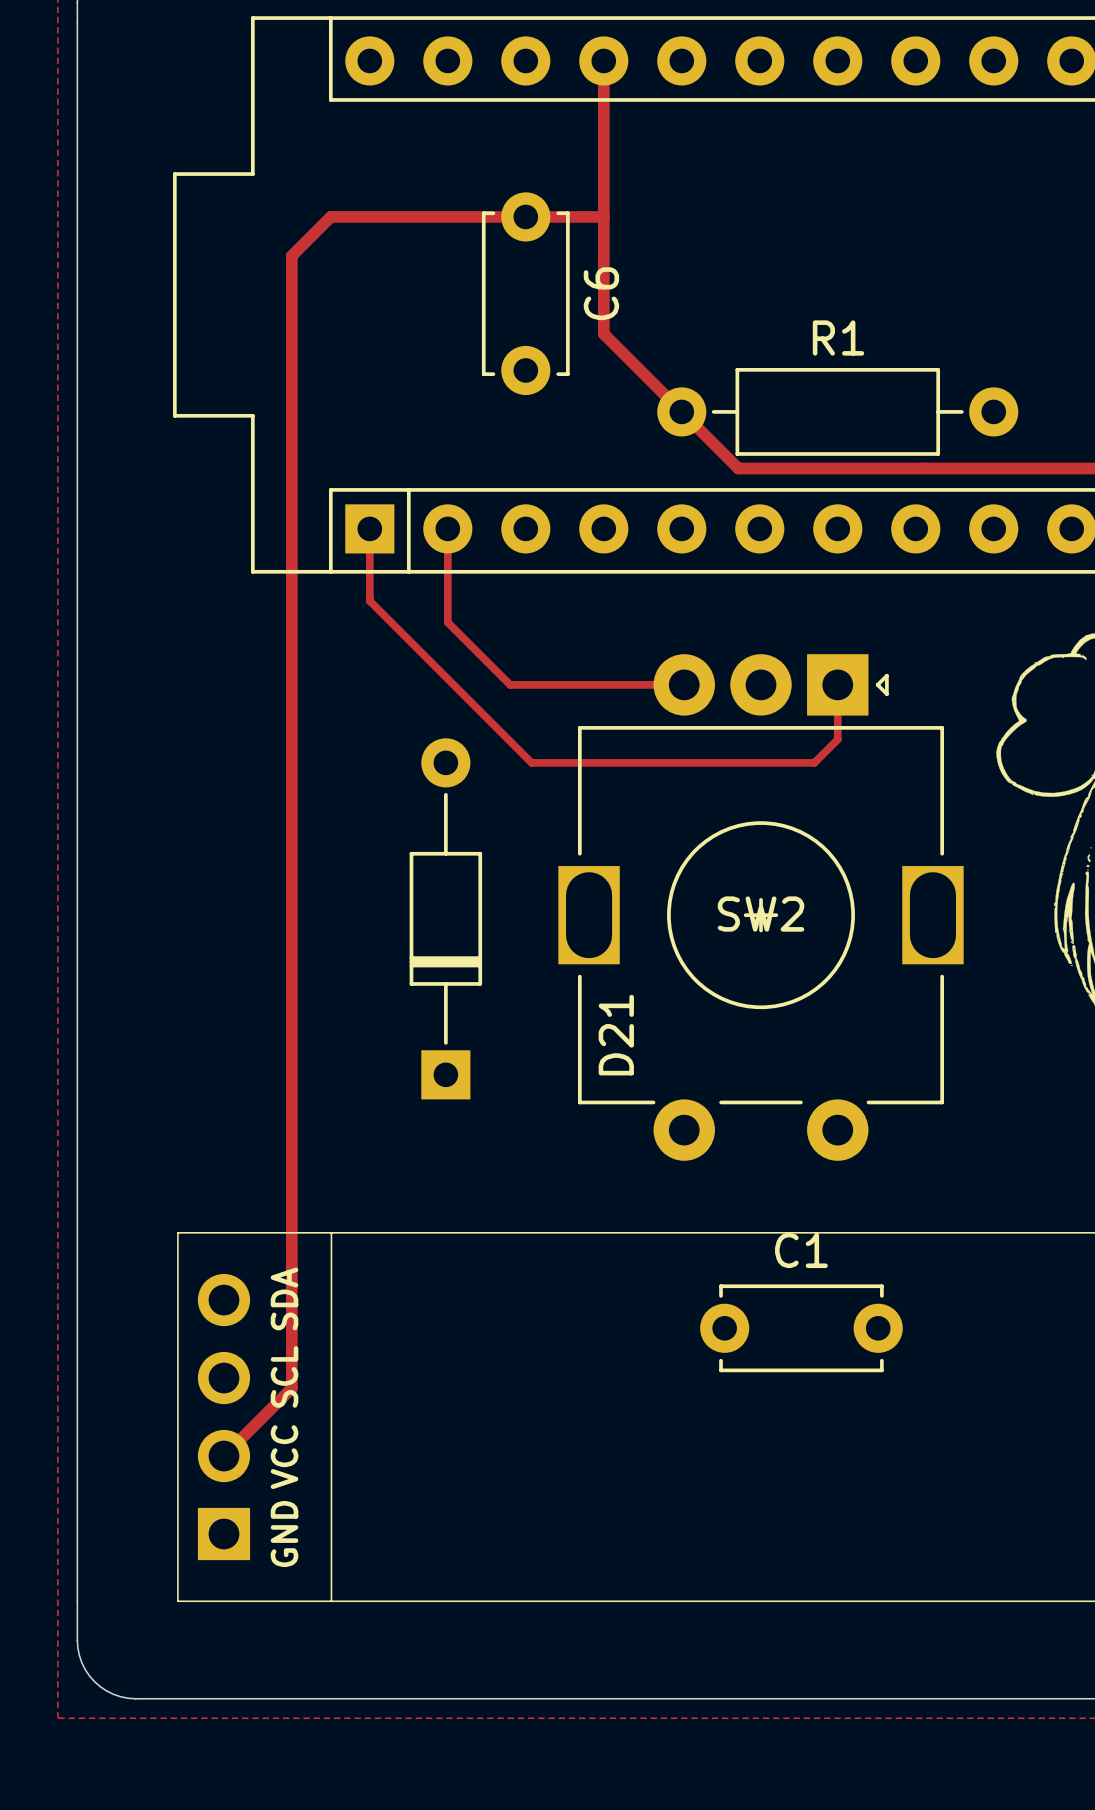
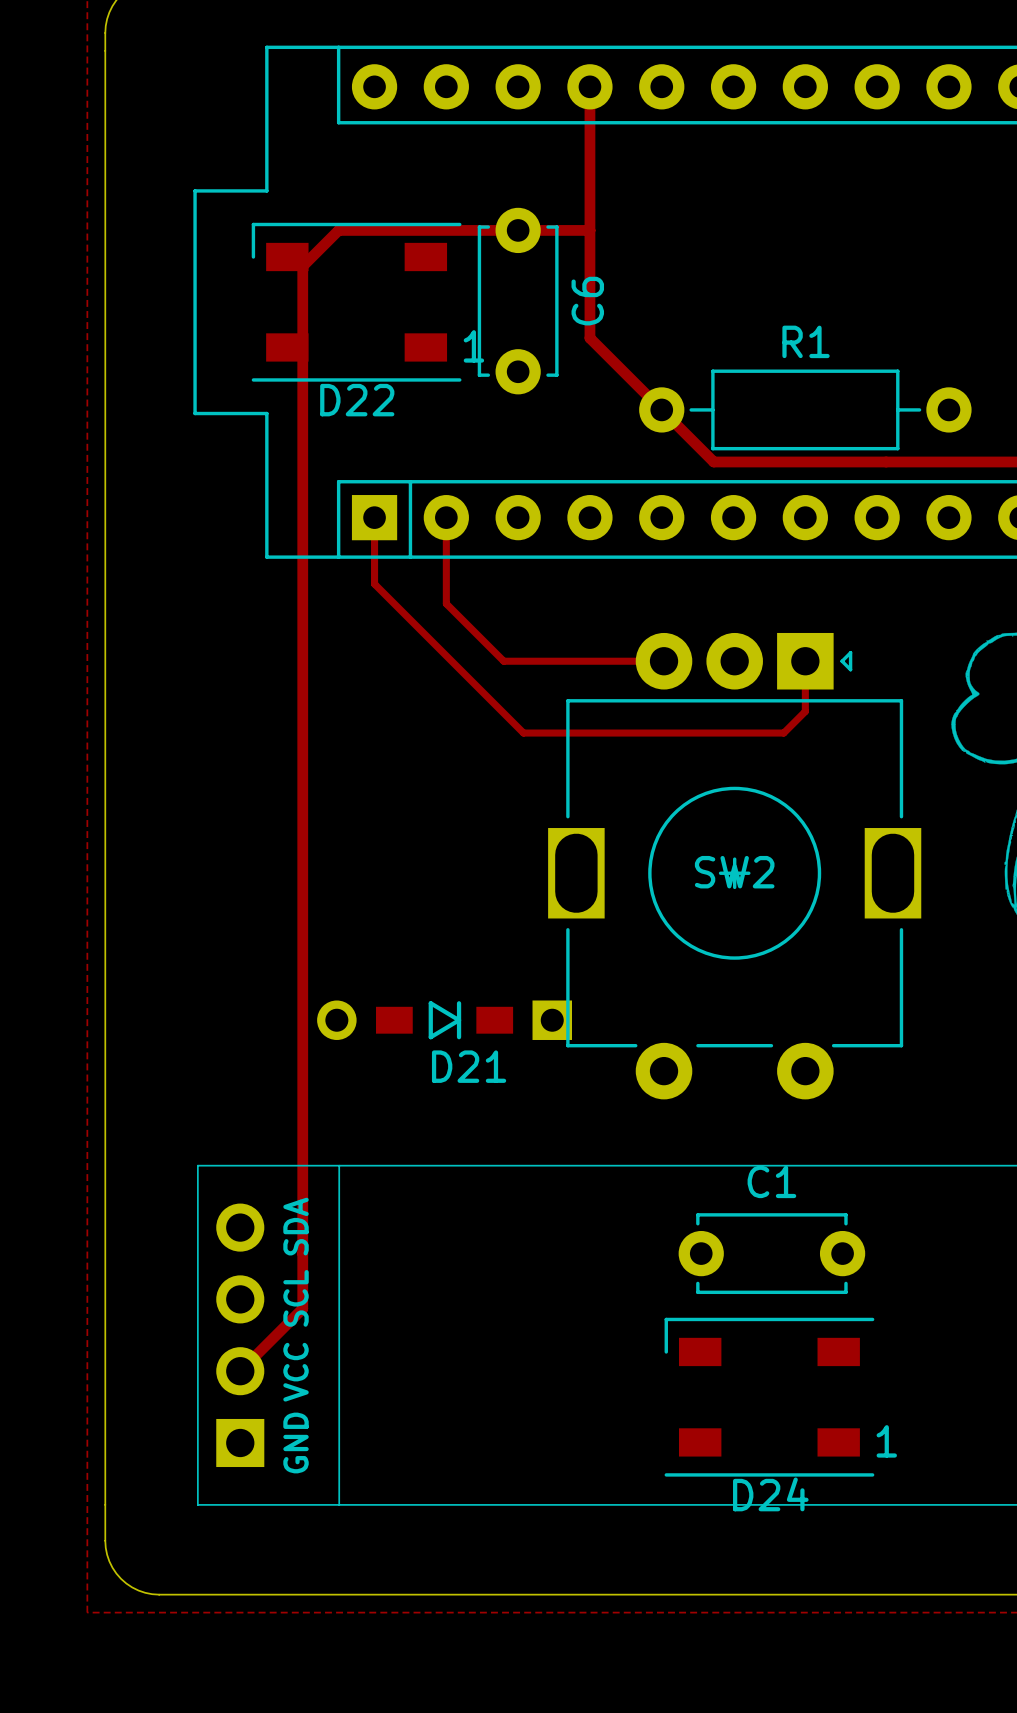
D22: none -> (356, 302)
D21 footprint: [409, 738, 483, 1100] -> [317, 1000, 573, 1040]
D21 name position: D21 (616, 1035) -> D21 (469, 1066)
D24: none -> (769, 1397)

